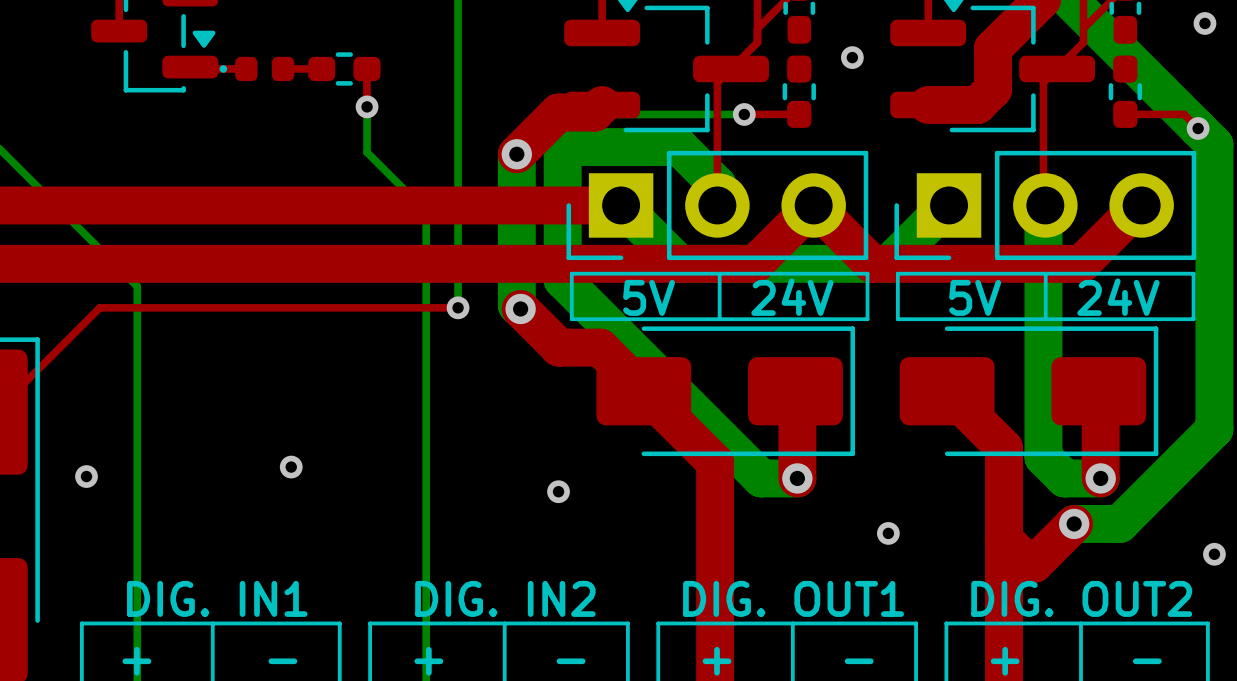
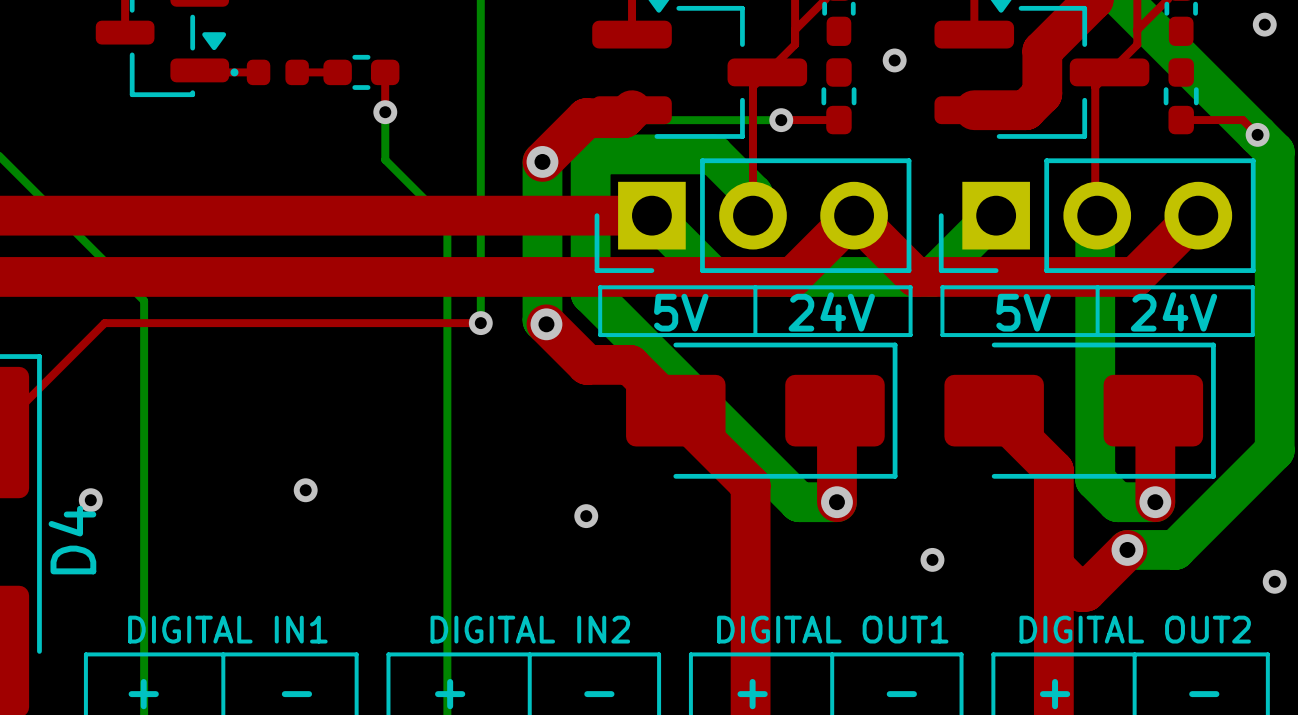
D4 name: none -> D4 (72, 540)
text: DIG. IN1 (217, 598) -> DIGITAL IN1 (227, 629)
text: DIG. IN2 (505, 598) -> DIGITAL IN2 (530, 629)
text: DIG. OUT1 (793, 598) -> DIGITAL OUT1 (832, 629)
text: DIG. OUT2 (1081, 598) -> DIGITAL OUT2 (1135, 629)

